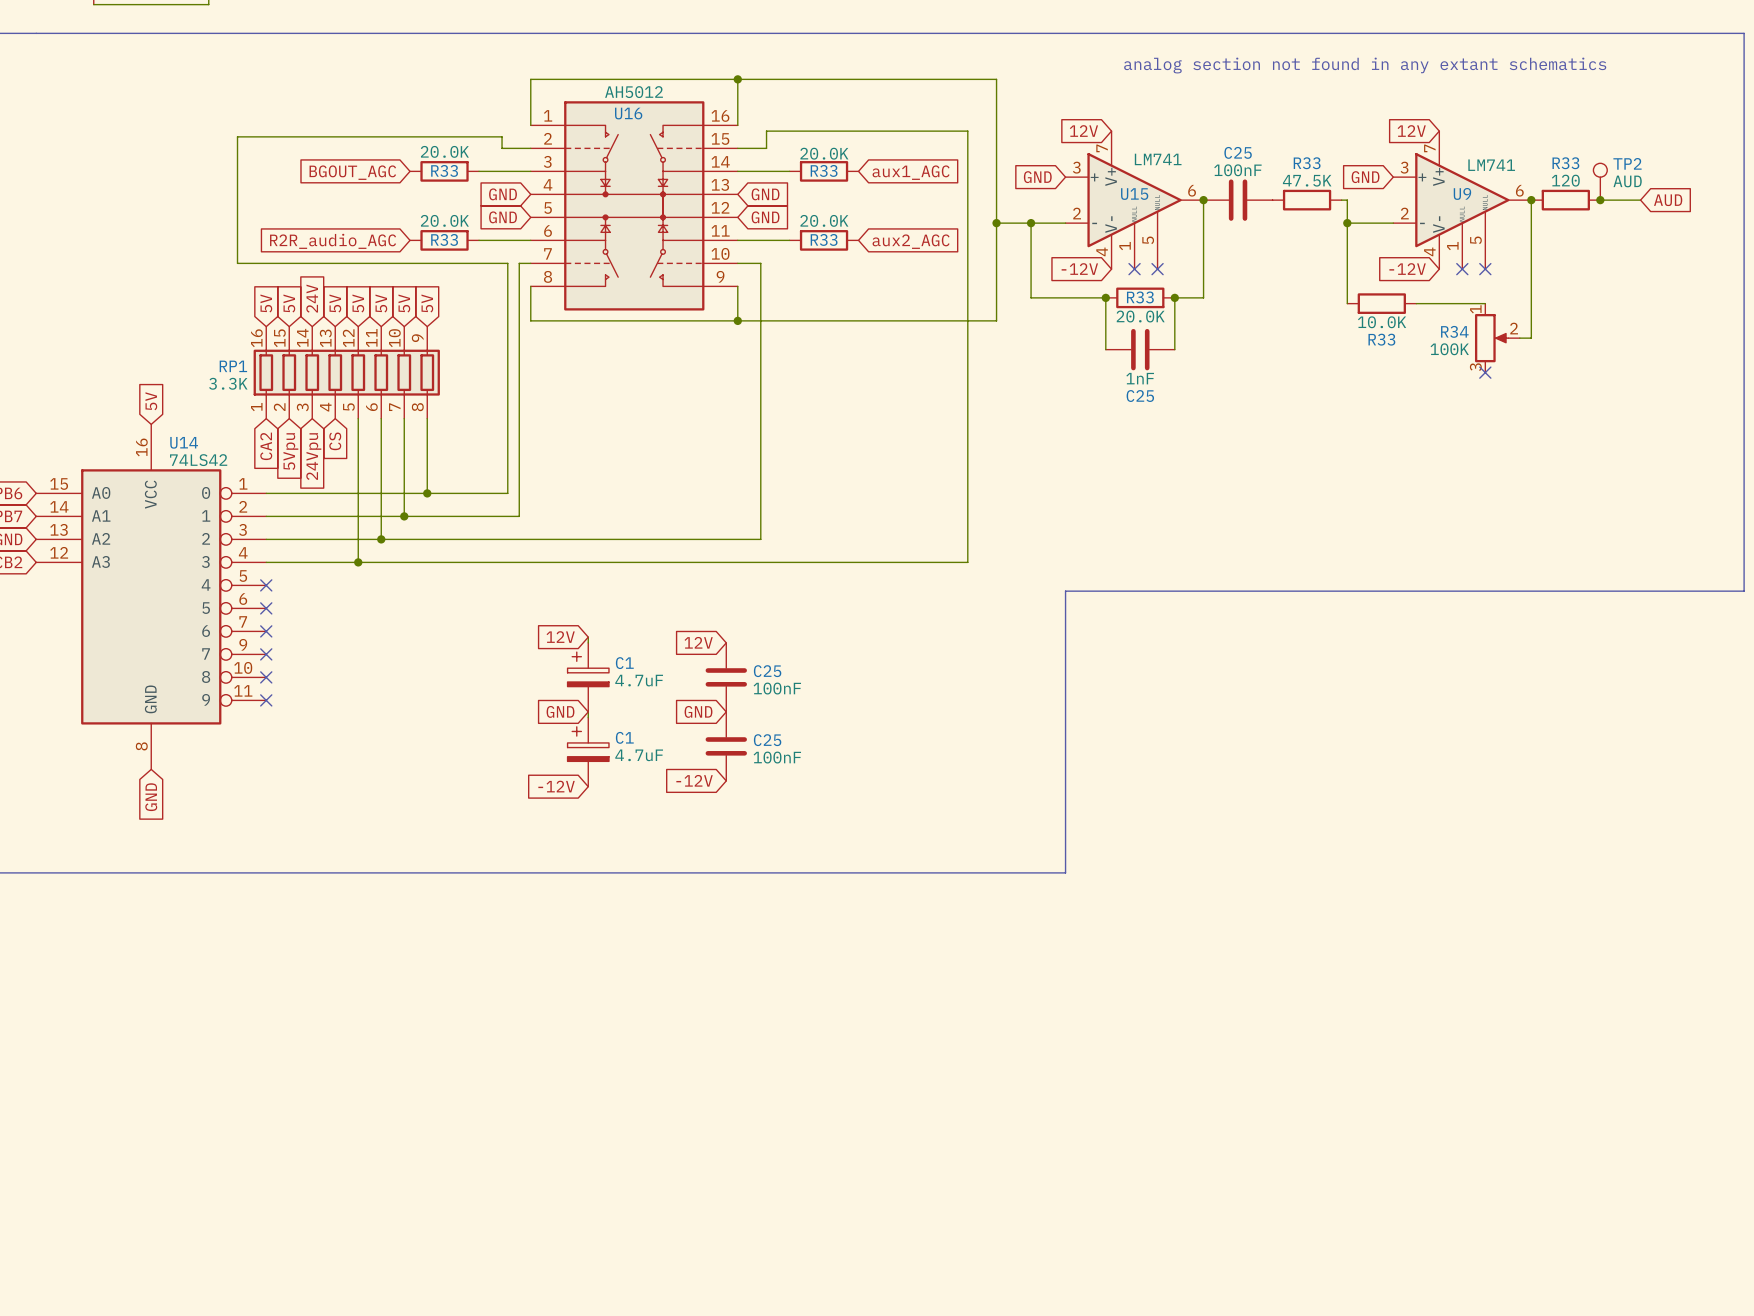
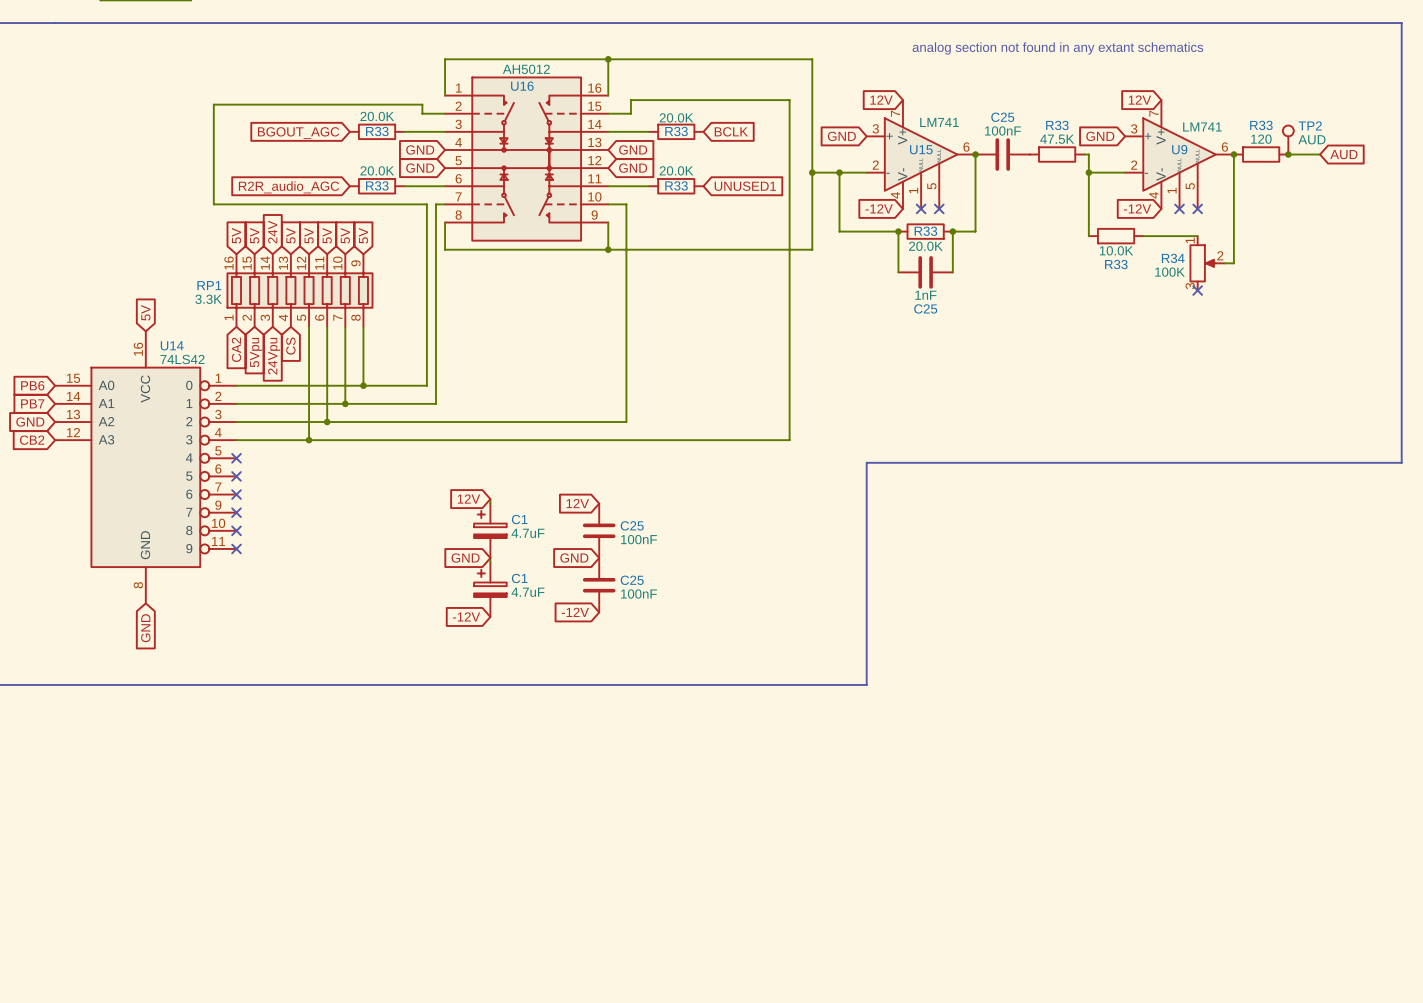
global label: aux1_AGC (911, 172) -> BCLK (731, 131)
global label: aux2_AGC (911, 241) -> UNUSED1 (745, 186)

